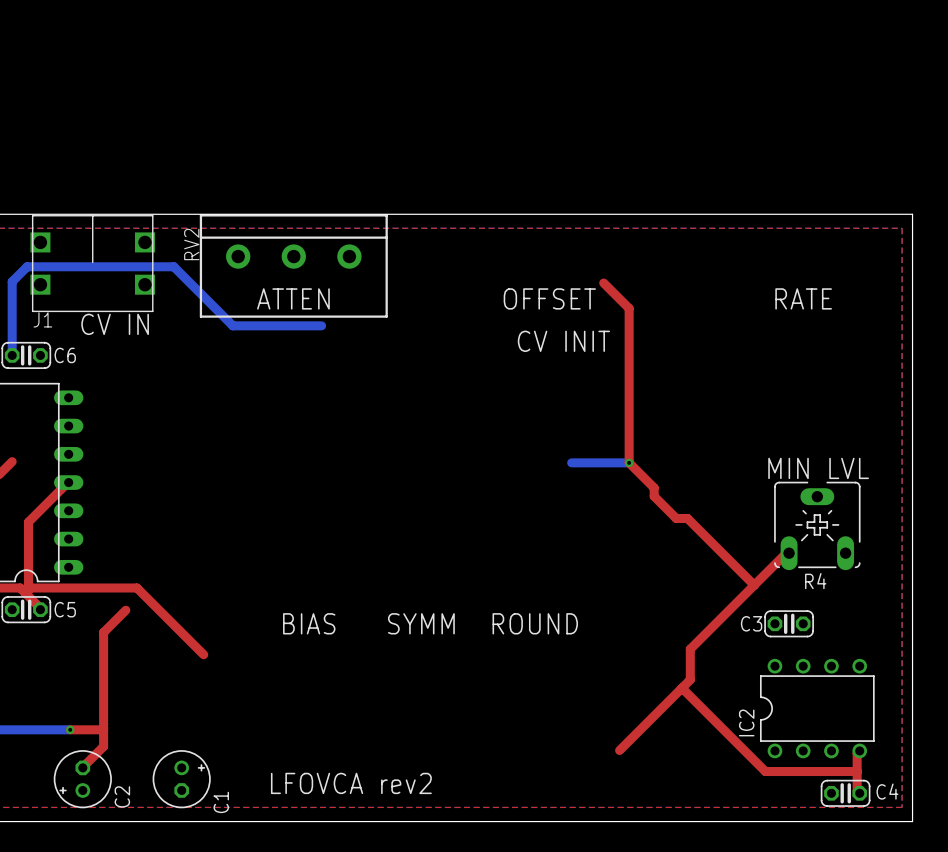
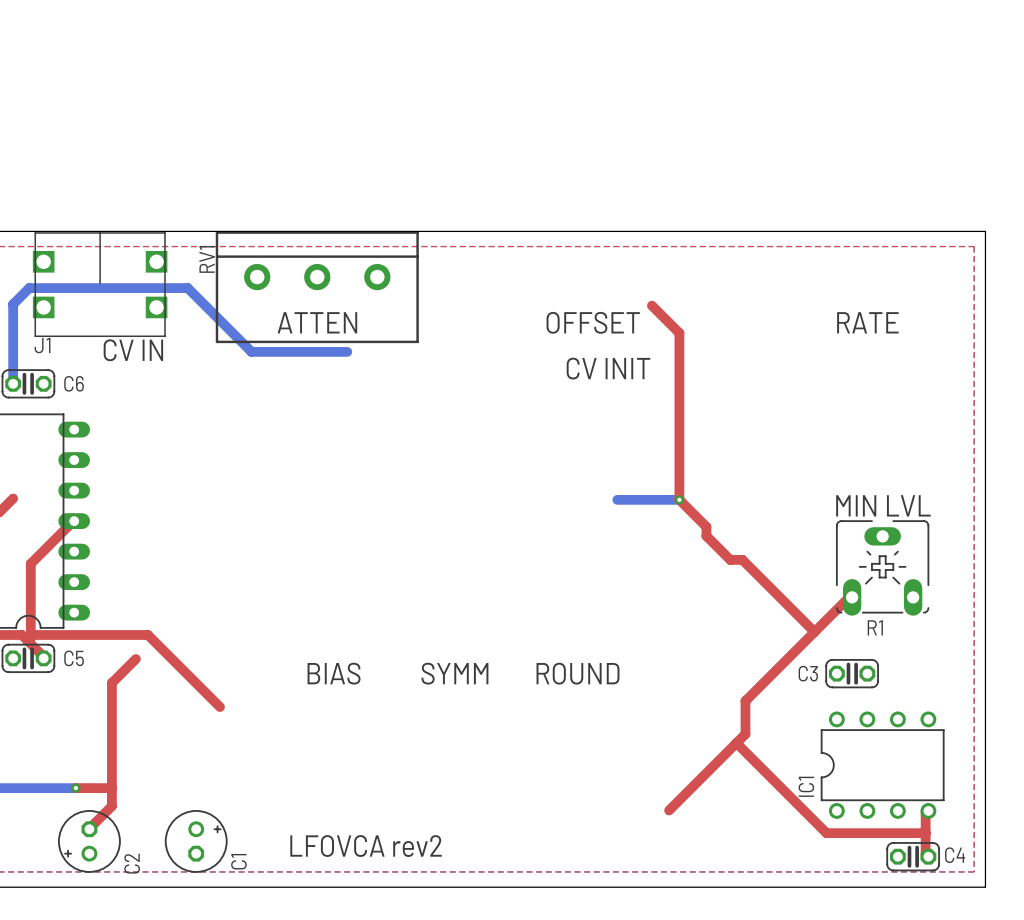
RV2 name: RV2 (191, 244) -> RV1 (207, 259)
R4 name: R4 (815, 581) -> R1 (875, 627)
IC2 name: IC2 (746, 722) -> IC1 (806, 786)

